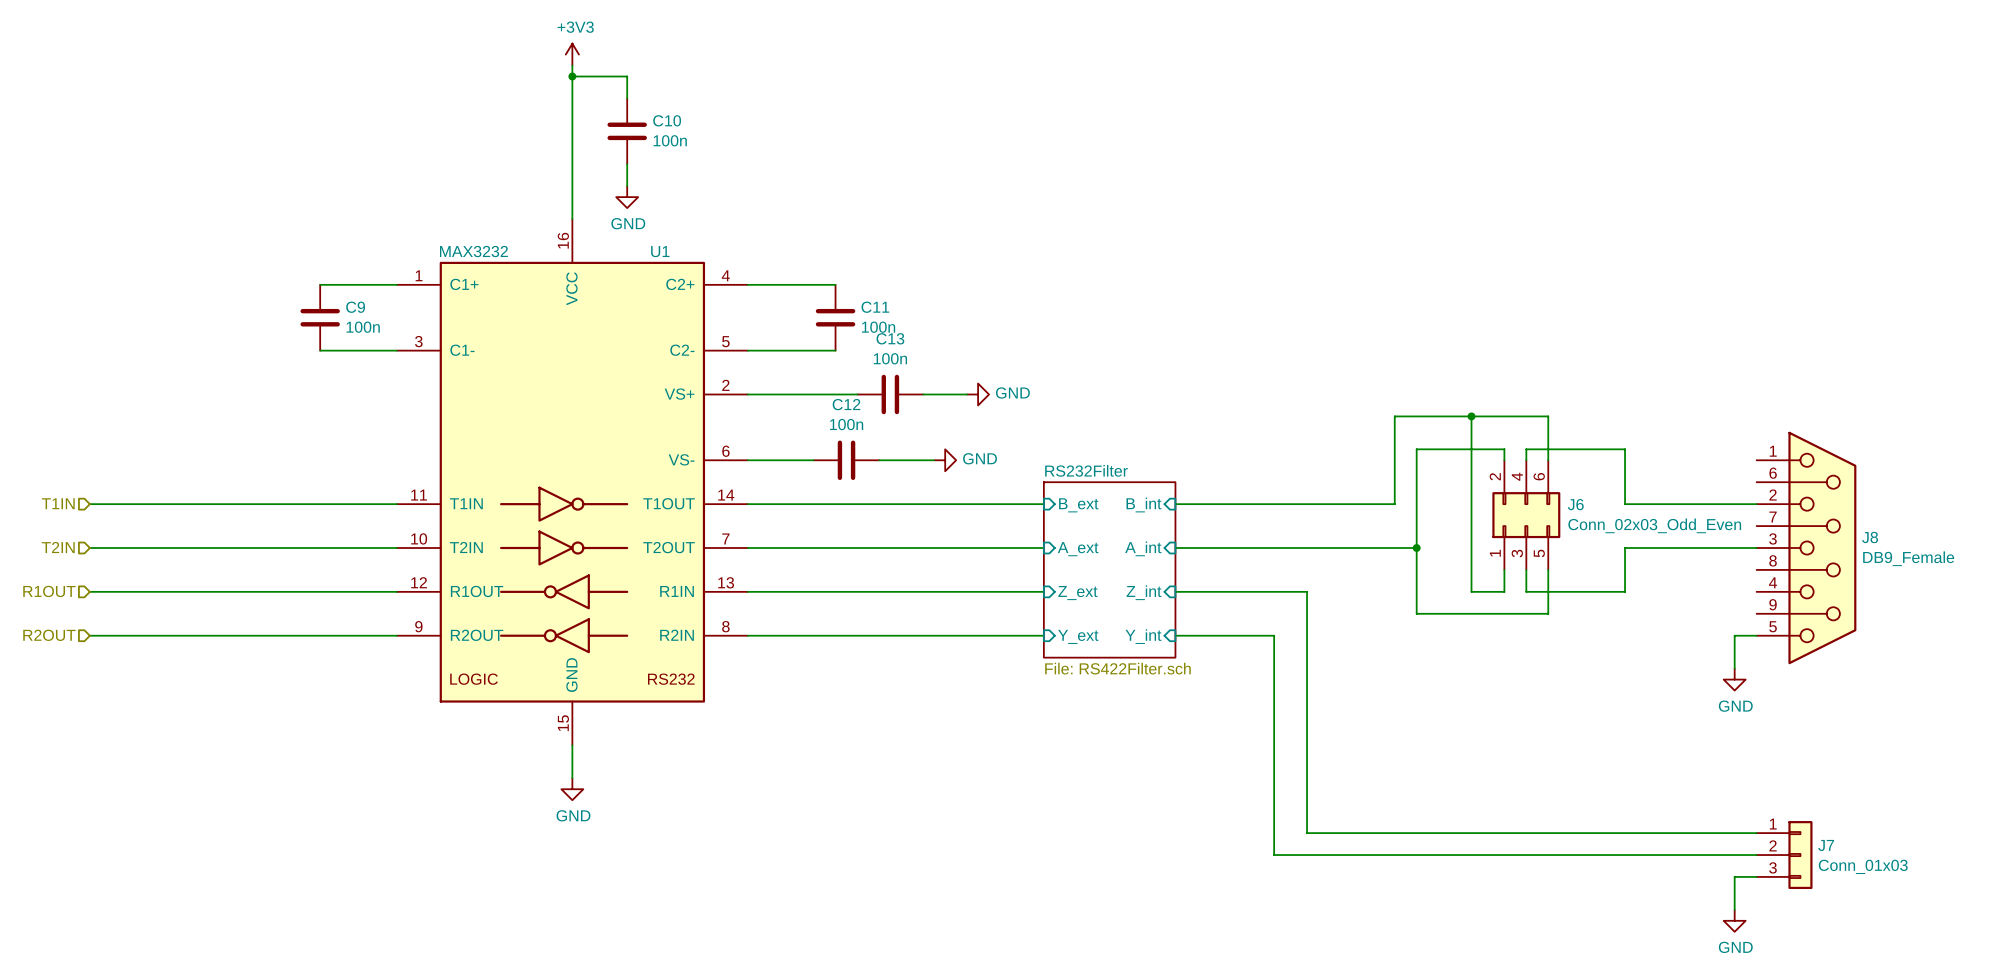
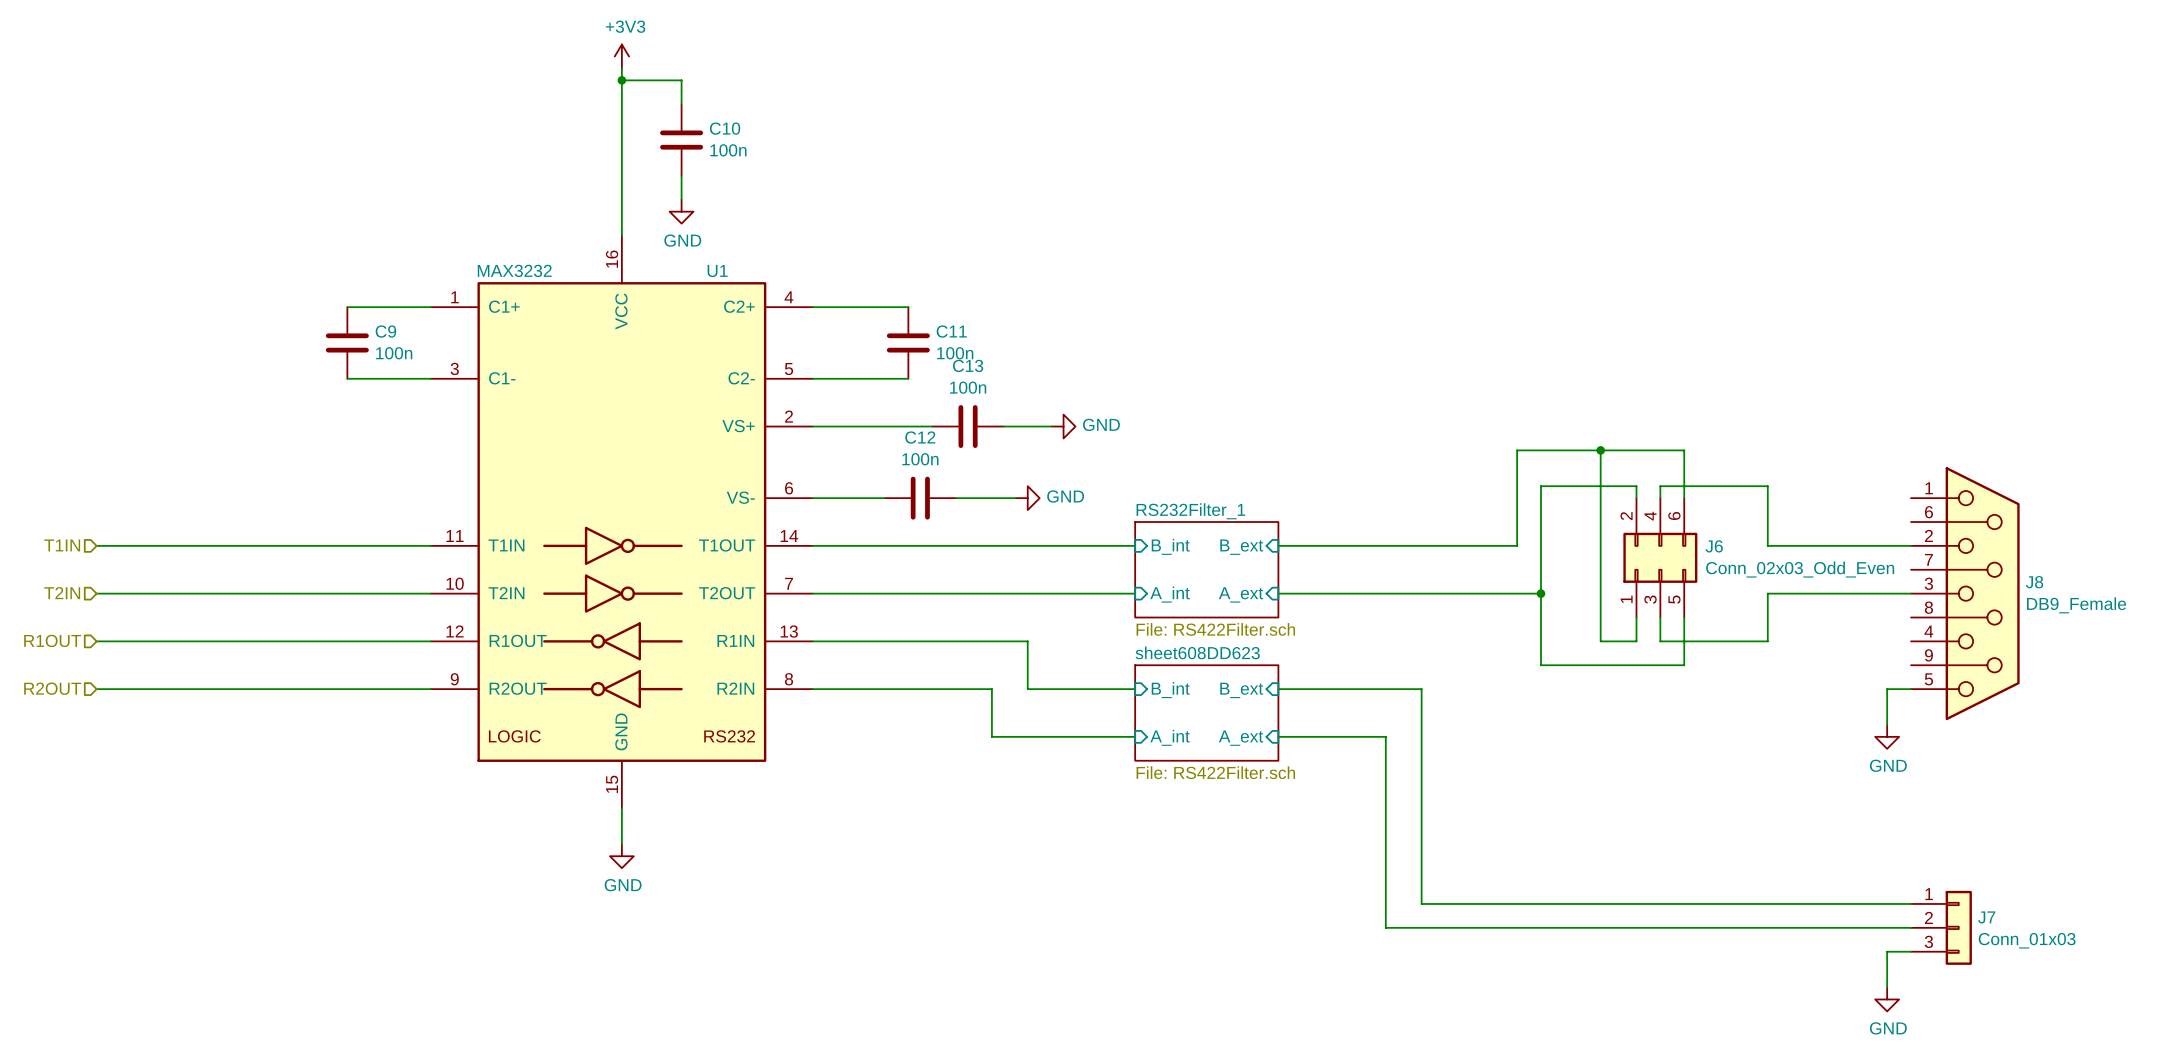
sheet pin: B_ext (1078, 505) -> B_int (1170, 546)
sheet pin: B_int (1143, 505) -> B_ext (1241, 547)
sheet RS232Filter_1: none -> File: RS422Filter.sch (1206, 569)
sheet pin: A_int (1143, 548) -> A_ext (1241, 594)
sheet pin: A_ext (1078, 549) -> A_int (1170, 594)
sheet RS232Filter: File: RS422Filter.sch (1109, 569) -> none
wire: (945, 591) (1043, 591) -> none
wire: (1175, 591) (1307, 591) (1307, 635) -> none
sheet pin: Z_int (1144, 592) -> none
sheet pin: Z_ext (1077, 593) -> none
wire: (912, 635) (945, 635) -> (1027, 641) (1027, 689)
wire: none -> (991, 689) (991, 736) (1135, 736)
wire: (1274, 635) (1274, 679) -> (1385, 689) (1421, 689)
sheet pin: Y_ext (1078, 636) -> B_int (1170, 690)
sheet pin: Y_int (1143, 636) -> B_ext (1241, 690)
sheet sheet608DD623: none -> File: RS422Filter.sch (1206, 713)
wire: none -> (1278, 736) (1385, 736)
sheet pin: none -> A_int (1170, 737)
sheet pin: none -> A_ext (1241, 738)

